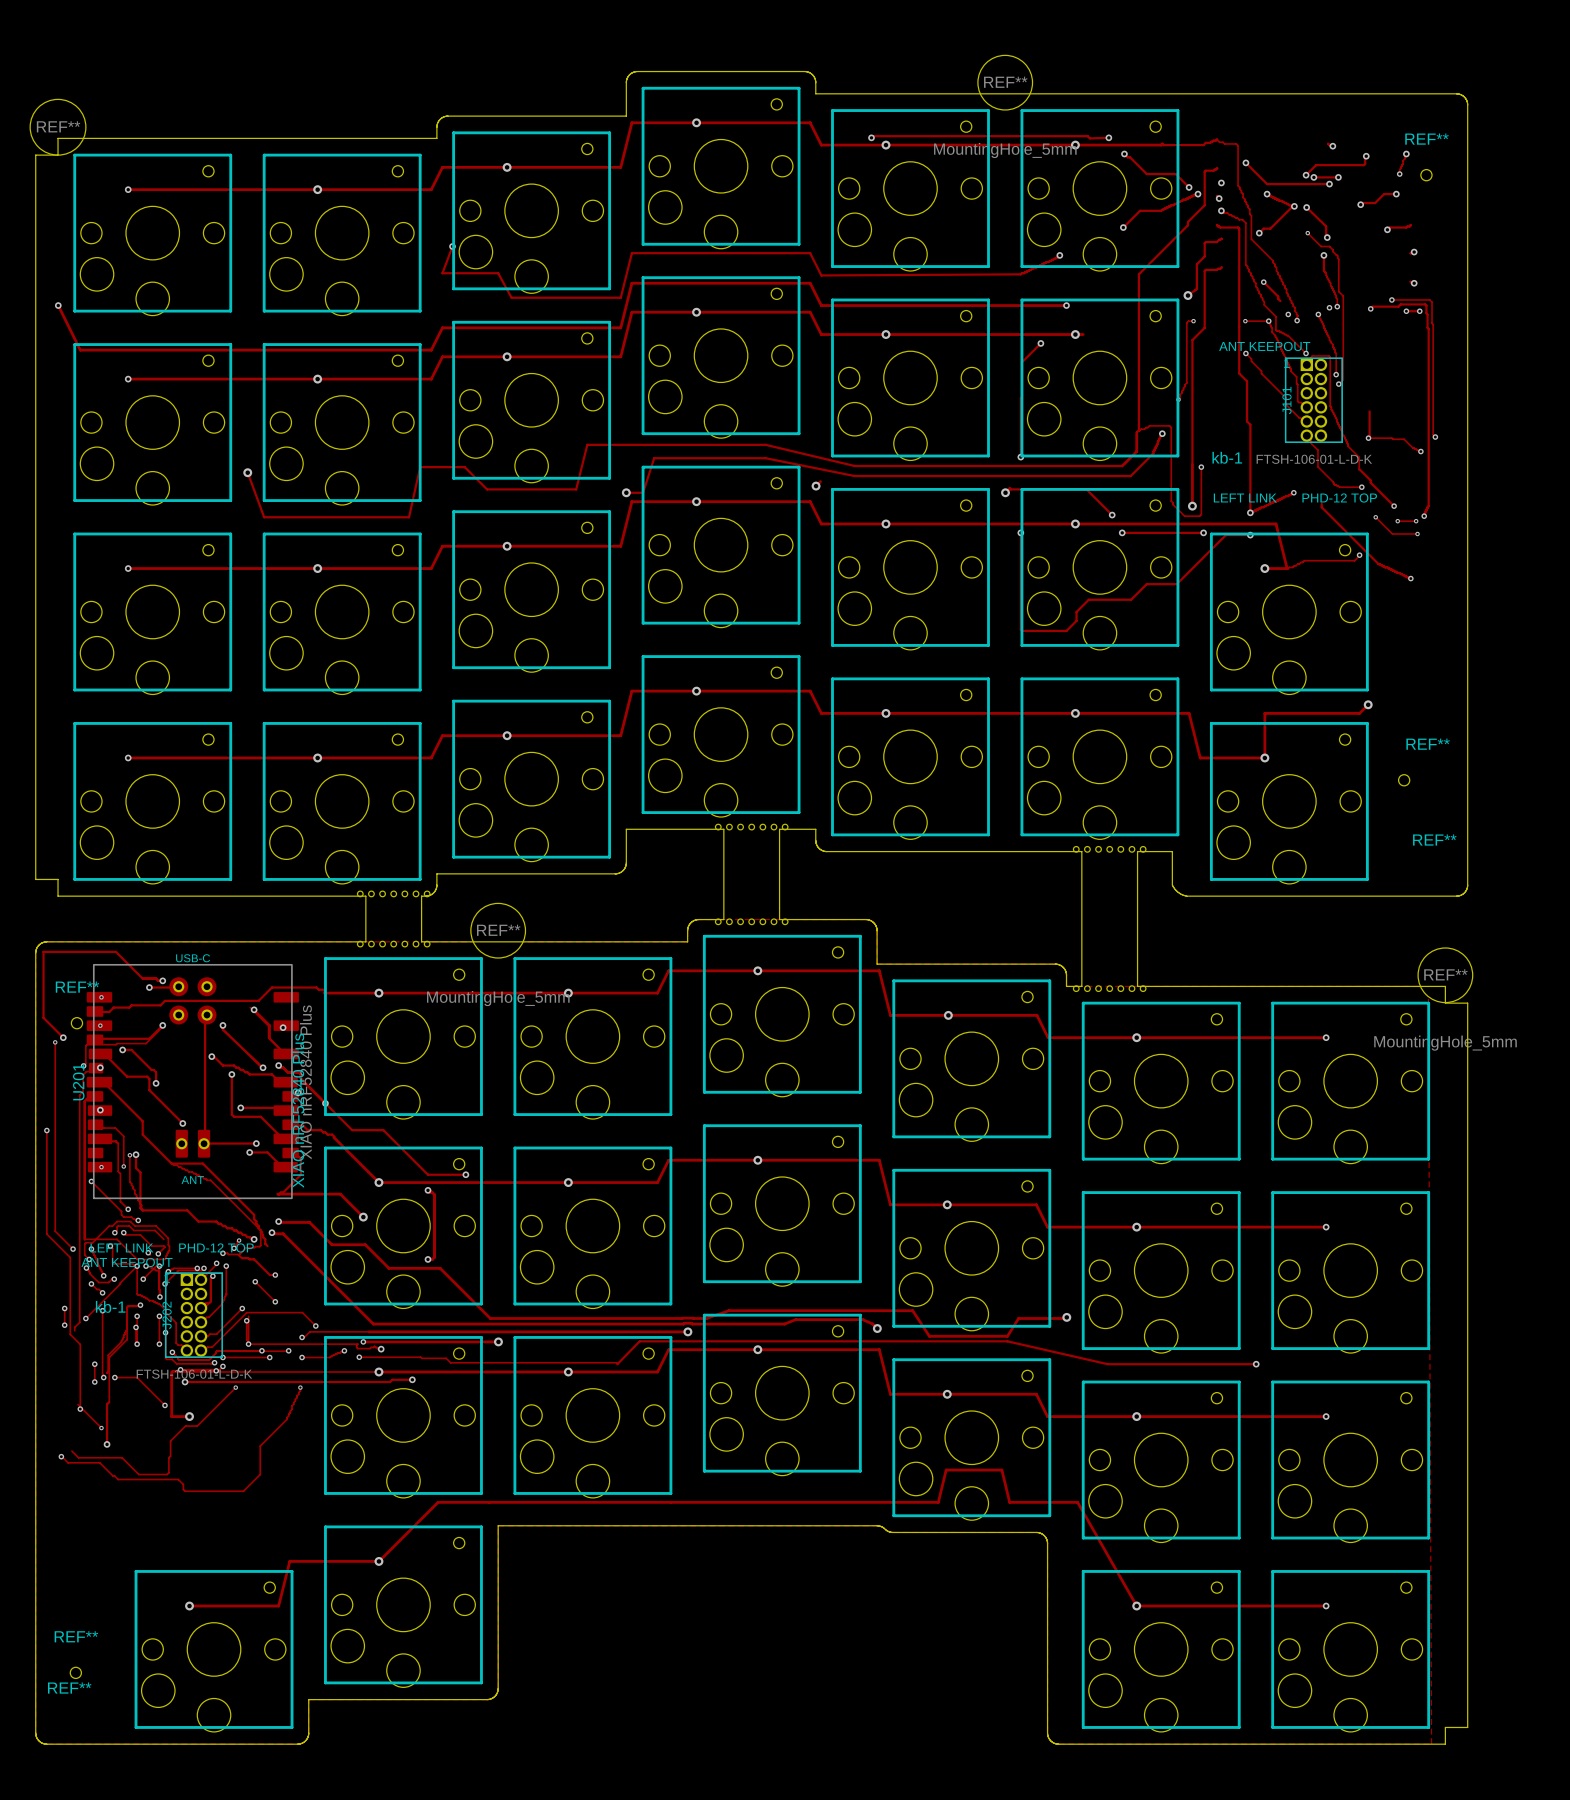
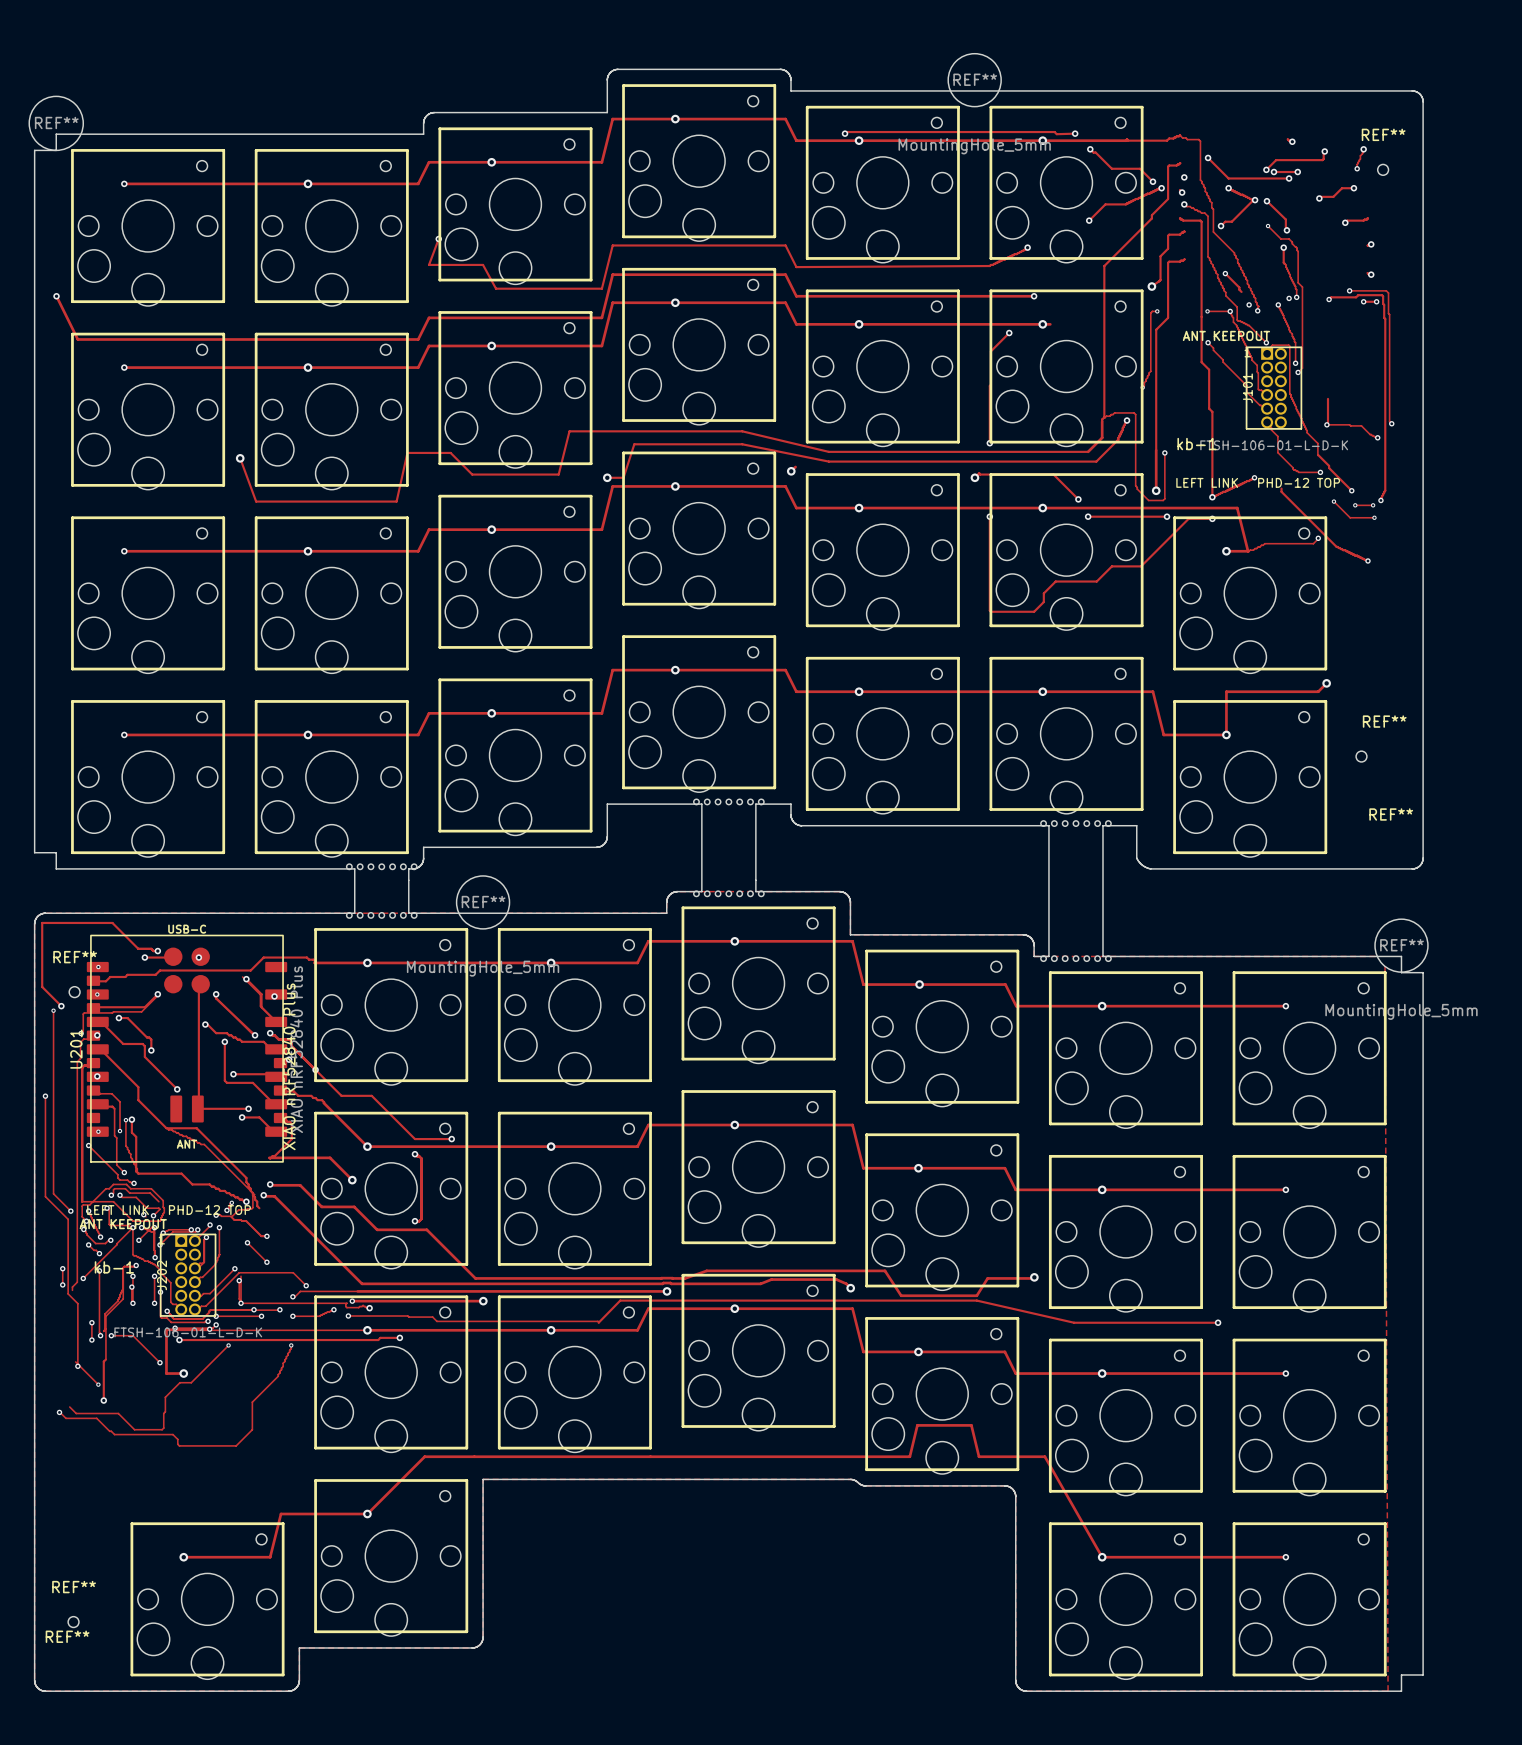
part footprint: [86, 963, 299, 1200] -> [86, 934, 288, 1163]
via: none -> (198, 957)

